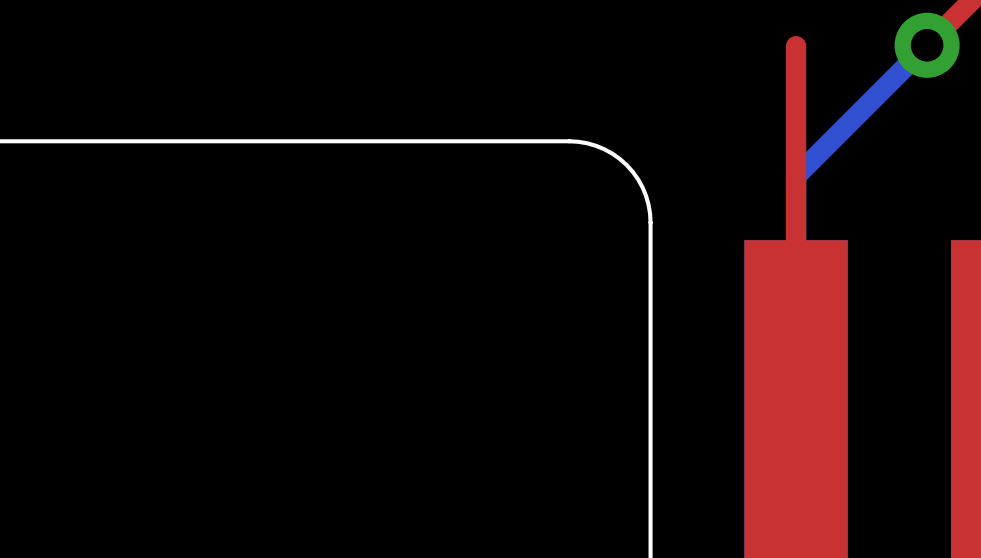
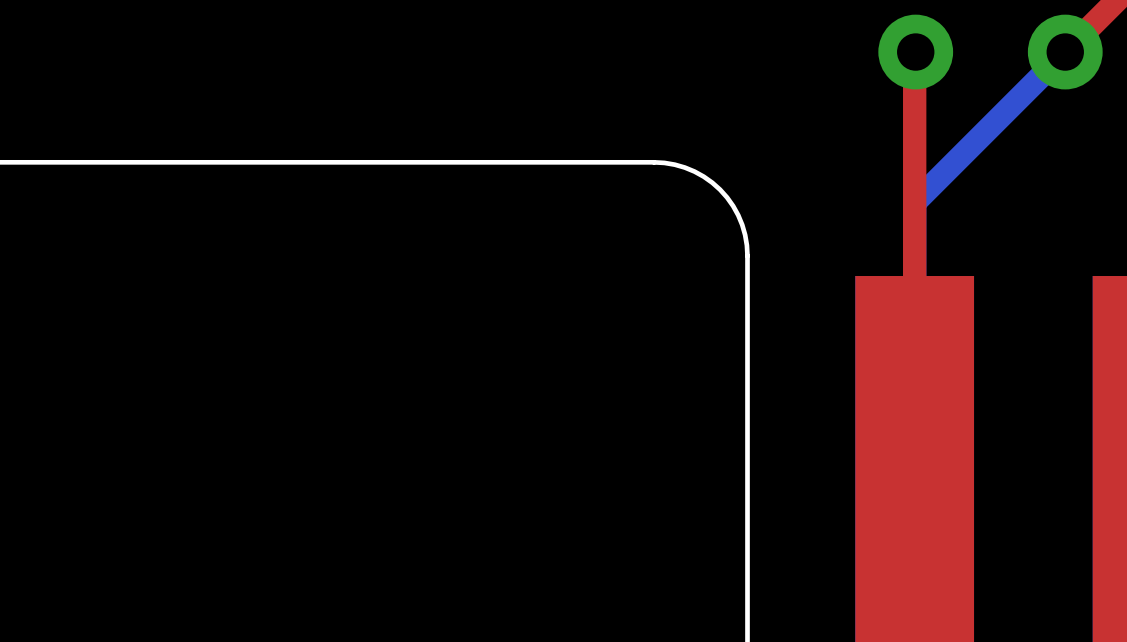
via: none -> (915, 52)

